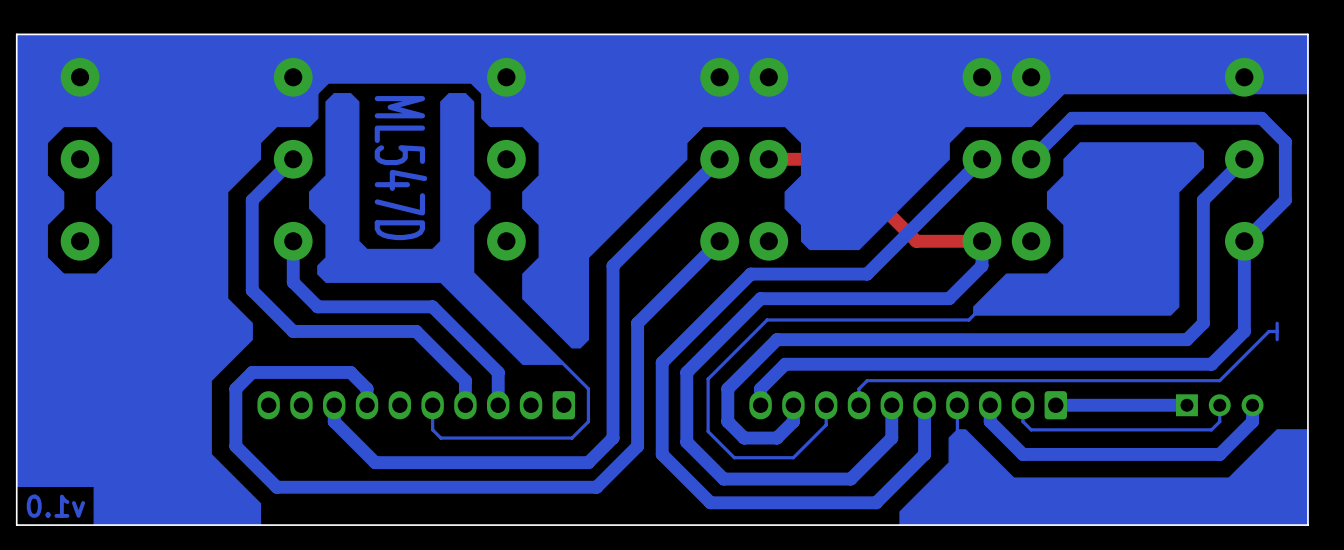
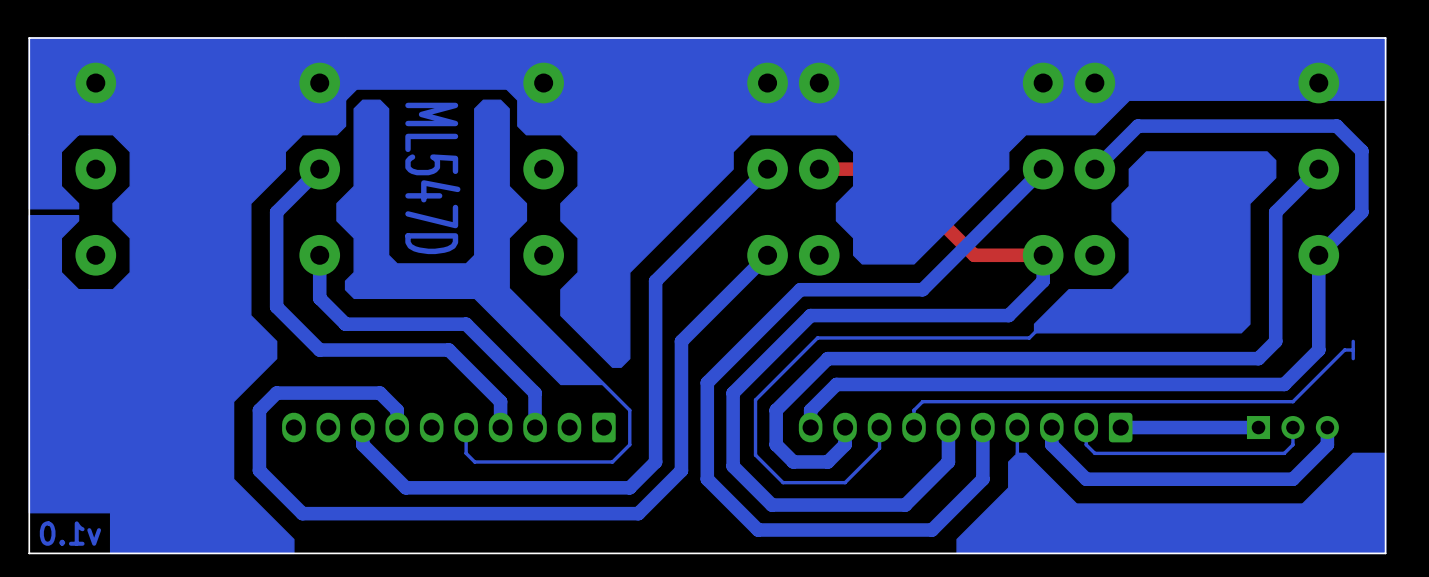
drawing shape: [16, 33, 319, 526] -> [28, 37, 347, 555]
drawing: [16, 125, 65, 275] -> none
drawing: none -> [28, 134, 80, 291]

